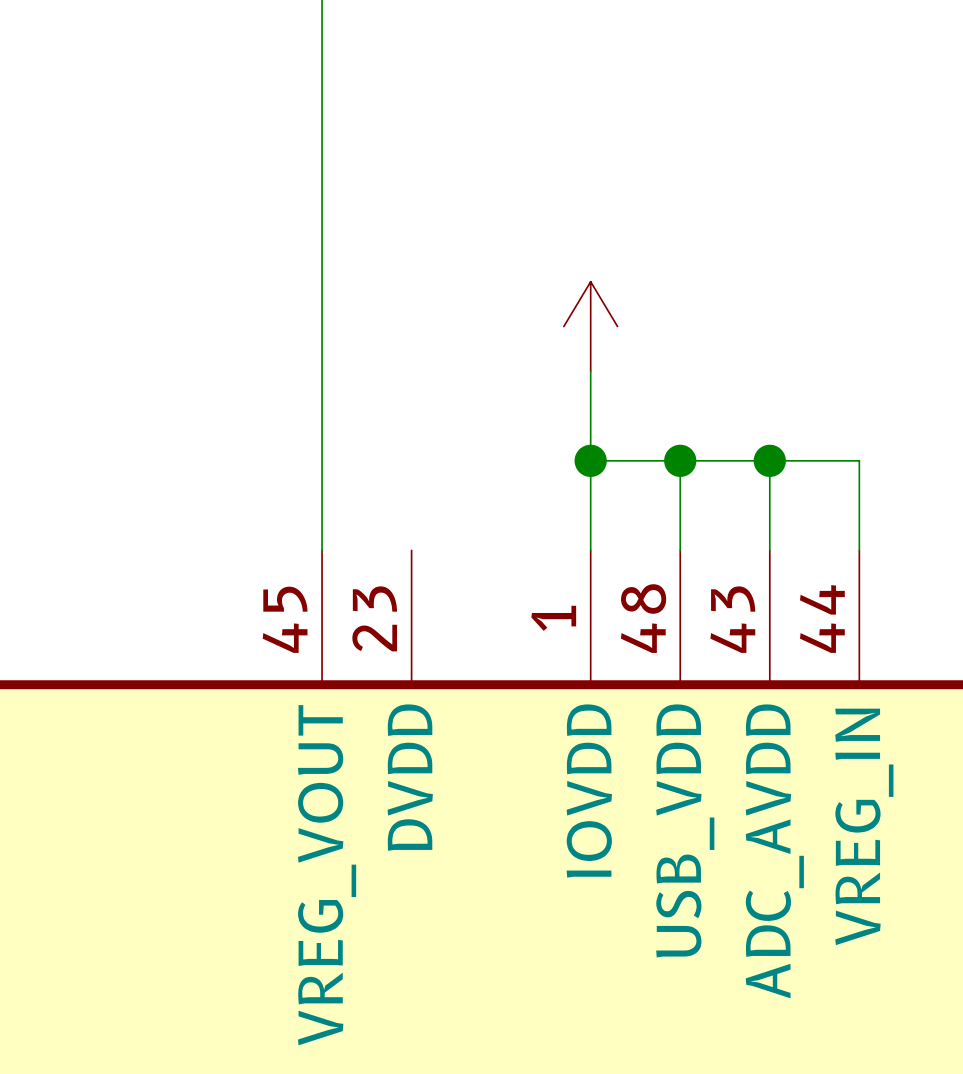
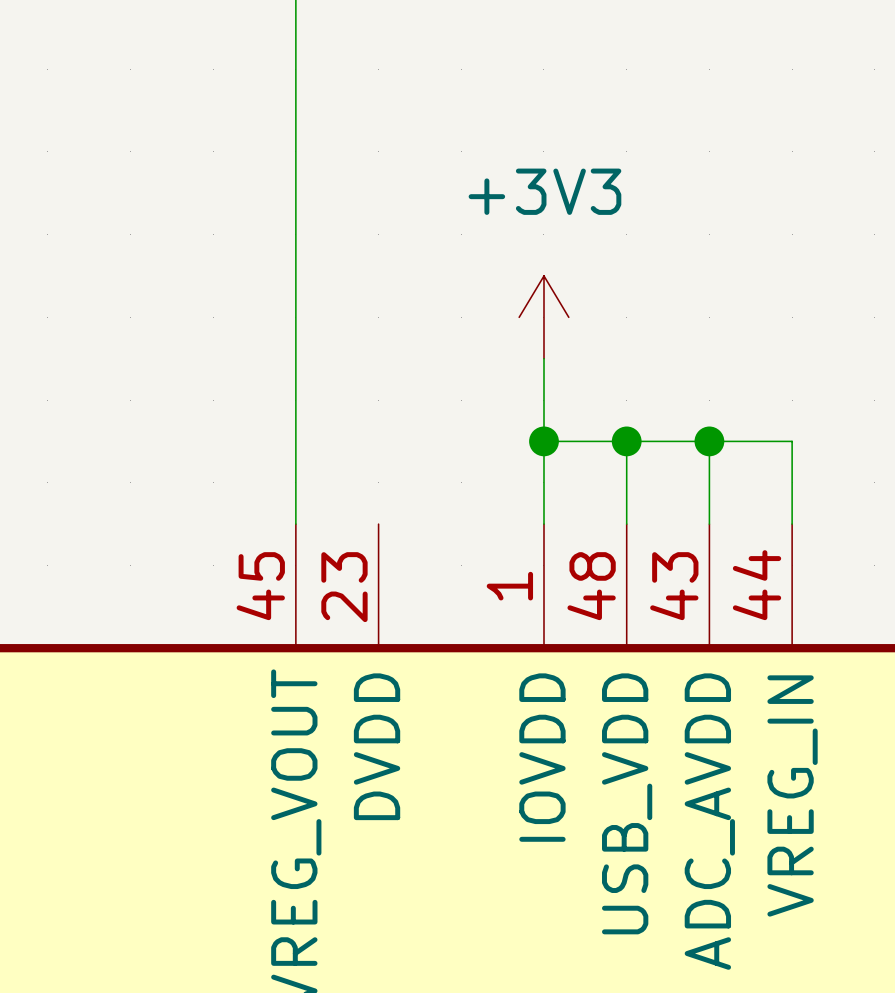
power symbol text: none -> +3V3 (544, 191)

